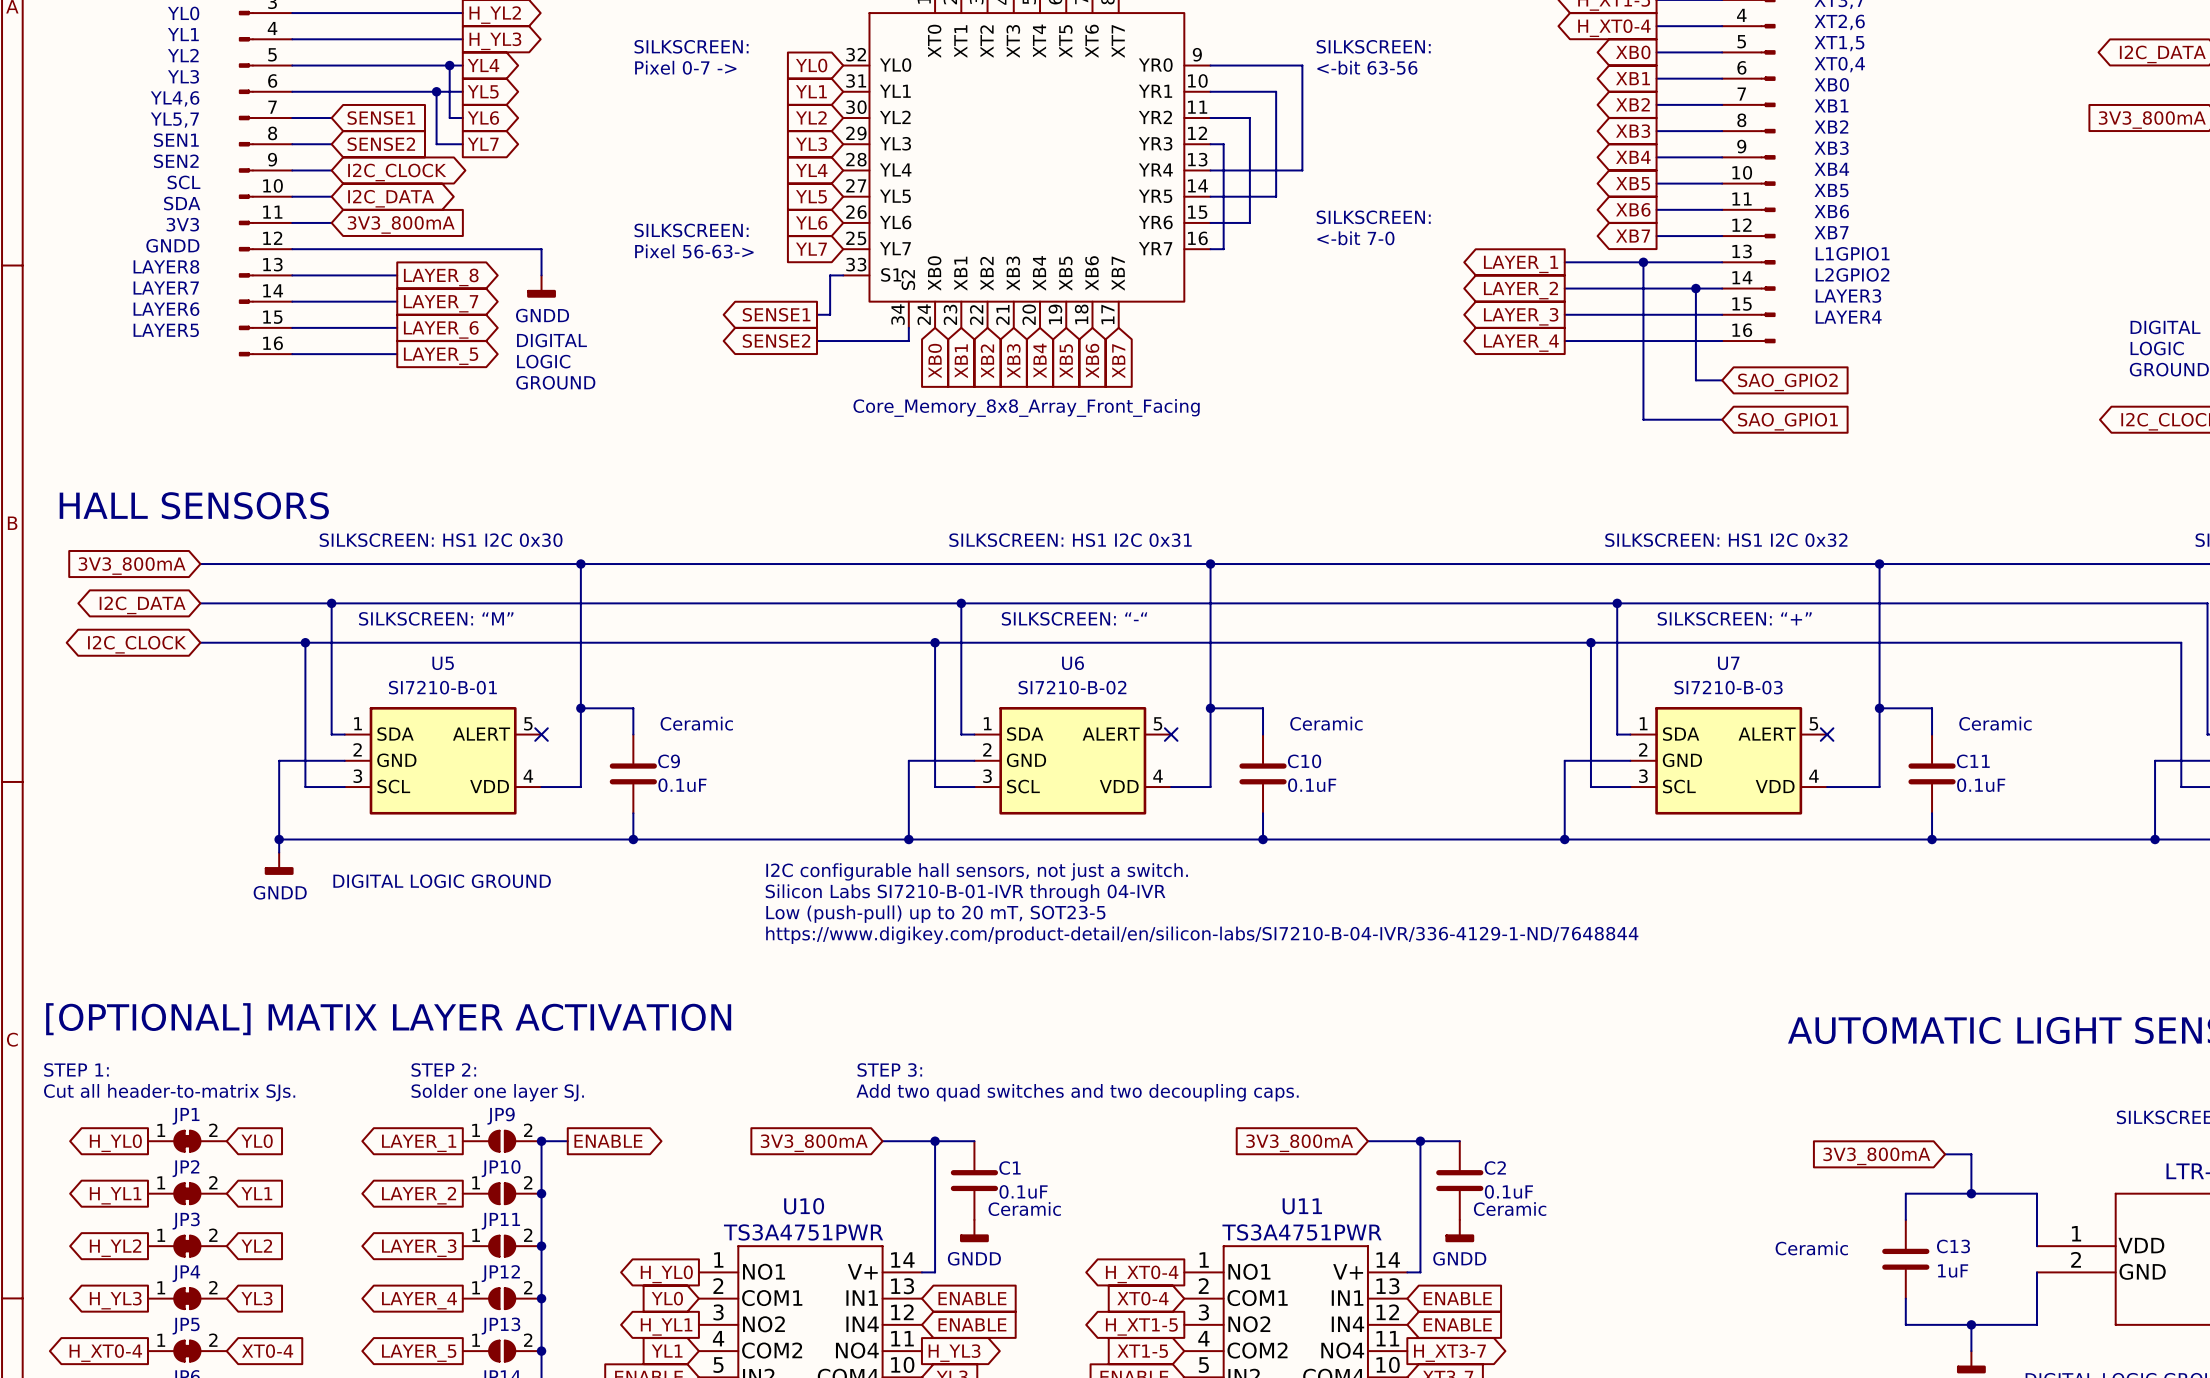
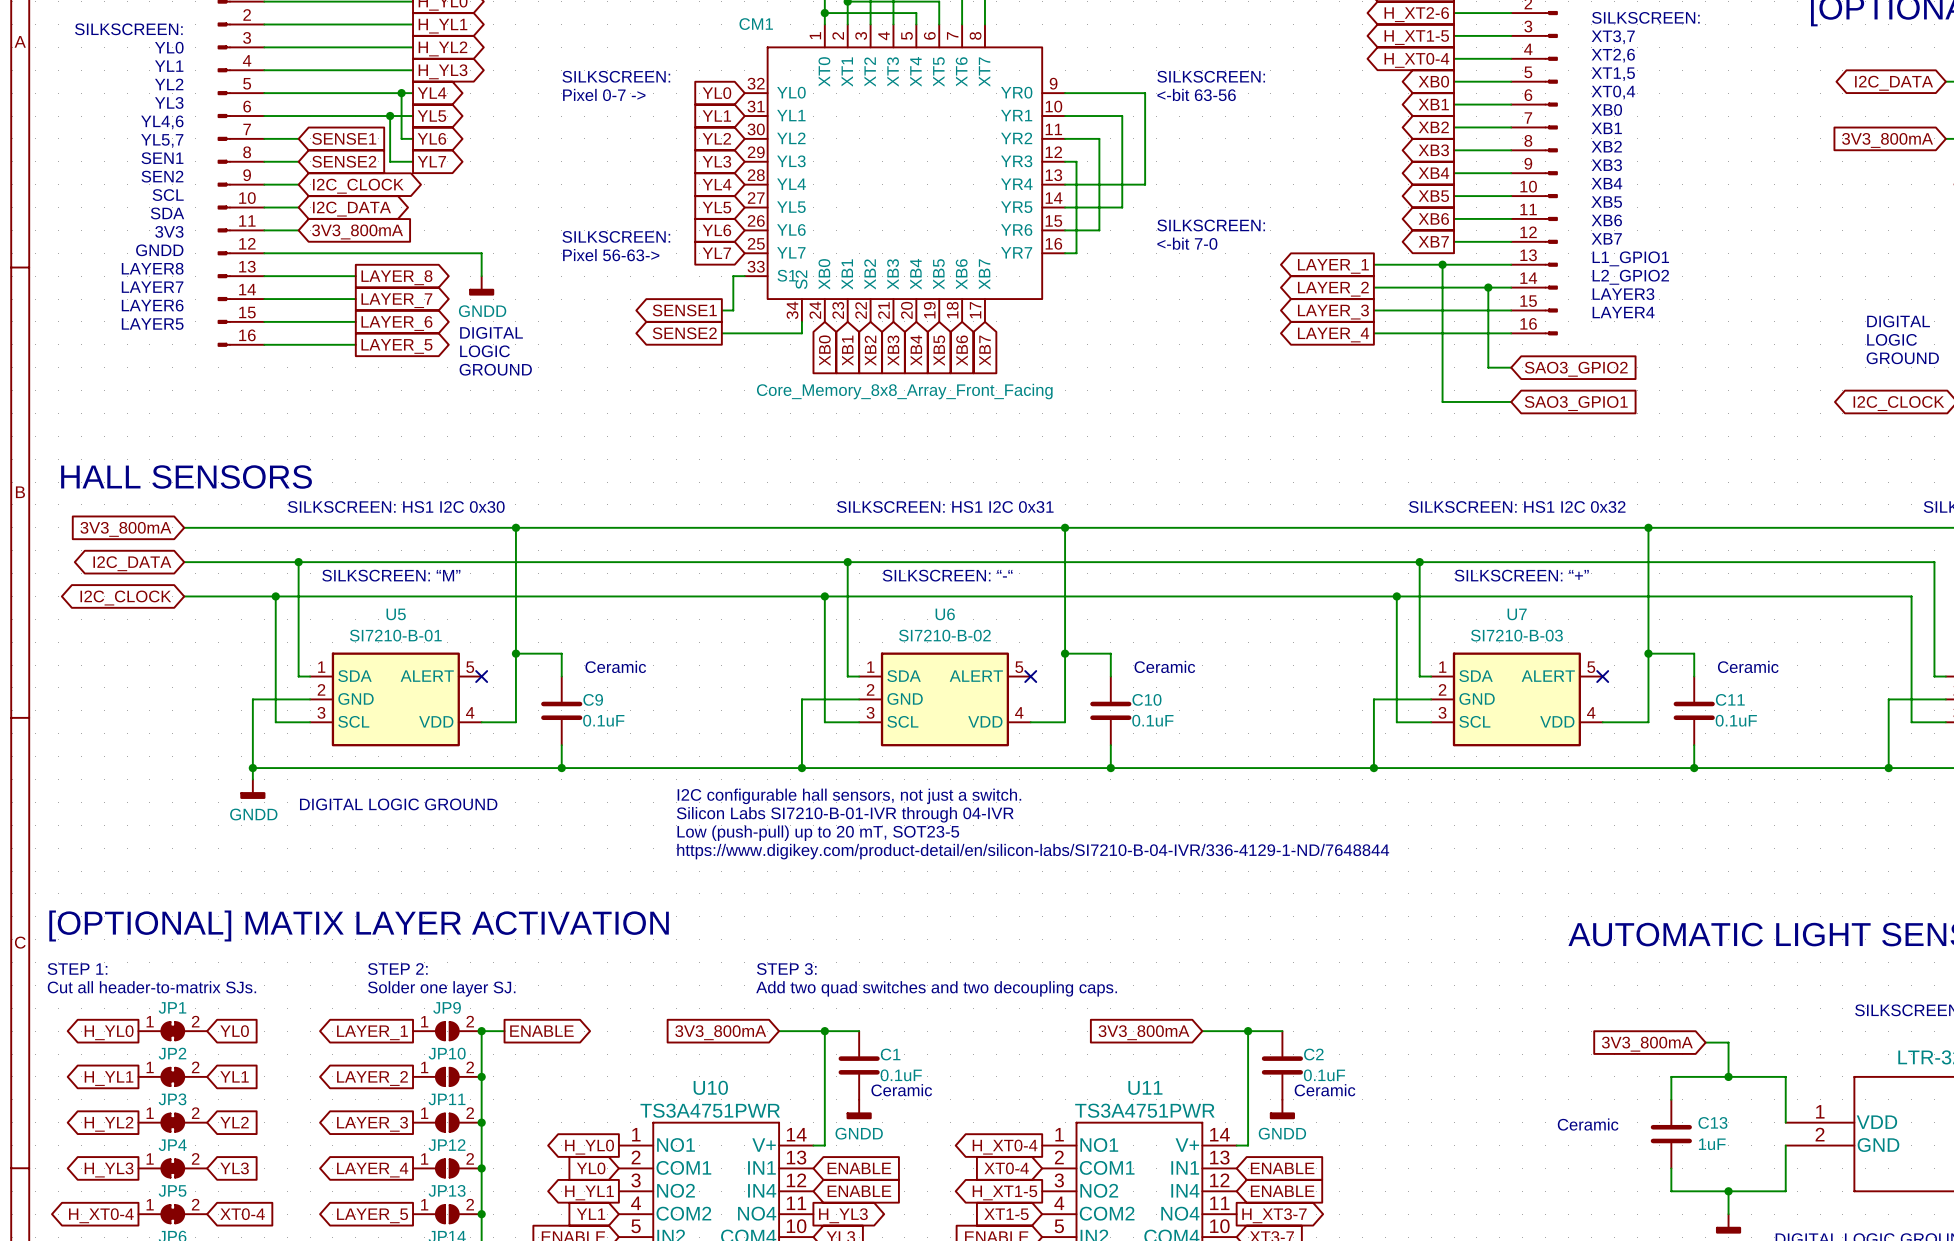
text: L1GPIO1 (1852, 253) -> L1_GPIO1 (1630, 258)
text: L2GPIO2 (1852, 274) -> L2_GPIO2 (1630, 277)
global label: SAO_GPIO2 (1787, 382) -> SAO3_GPIO2 (1576, 369)
global label: SAO_GPIO1 (1787, 421) -> SAO3_GPIO1 (1576, 403)

